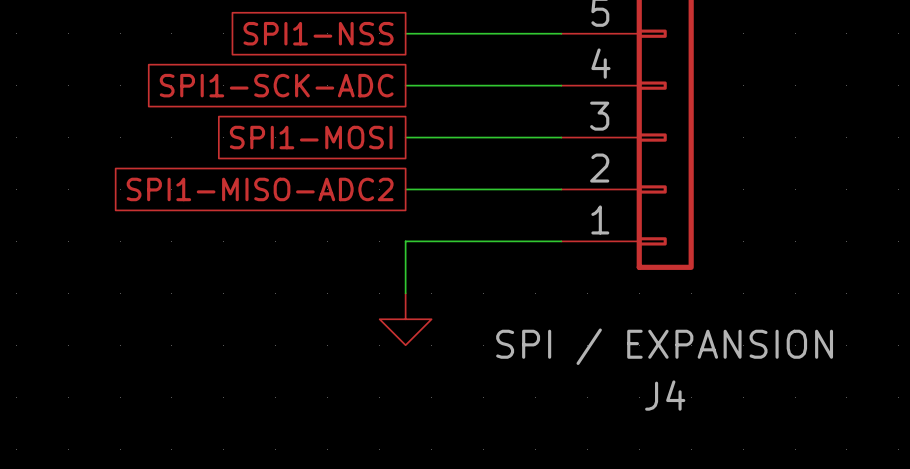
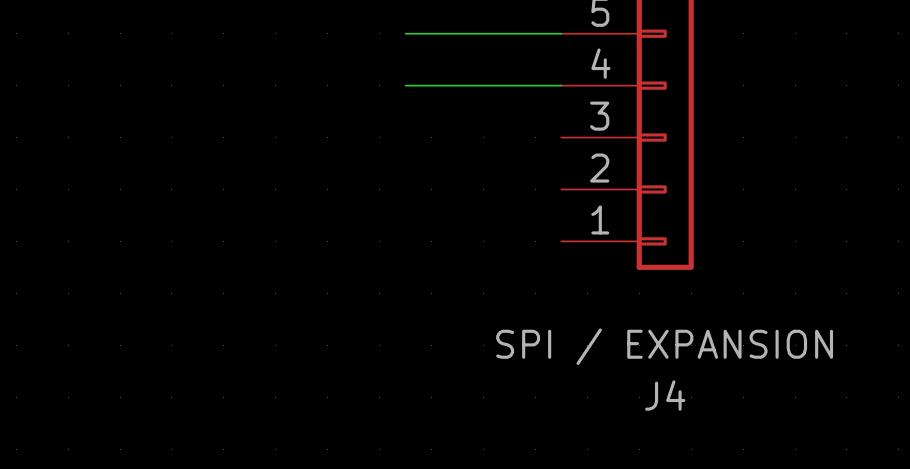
global label: SPI1-NSS (318, 33) -> none
global label: SPI1-SCK-ADC (276, 85) -> none
global label: SPI1-MOSI (311, 137) -> none
wire: (405, 137) (561, 137) -> none
global label: SPI1-MISO-ADC2 (260, 189) -> none
wire: (405, 189) (561, 189) -> none
wire: (561, 241) (405, 241) (405, 293) -> none
power symbol: (405, 319) -> none

